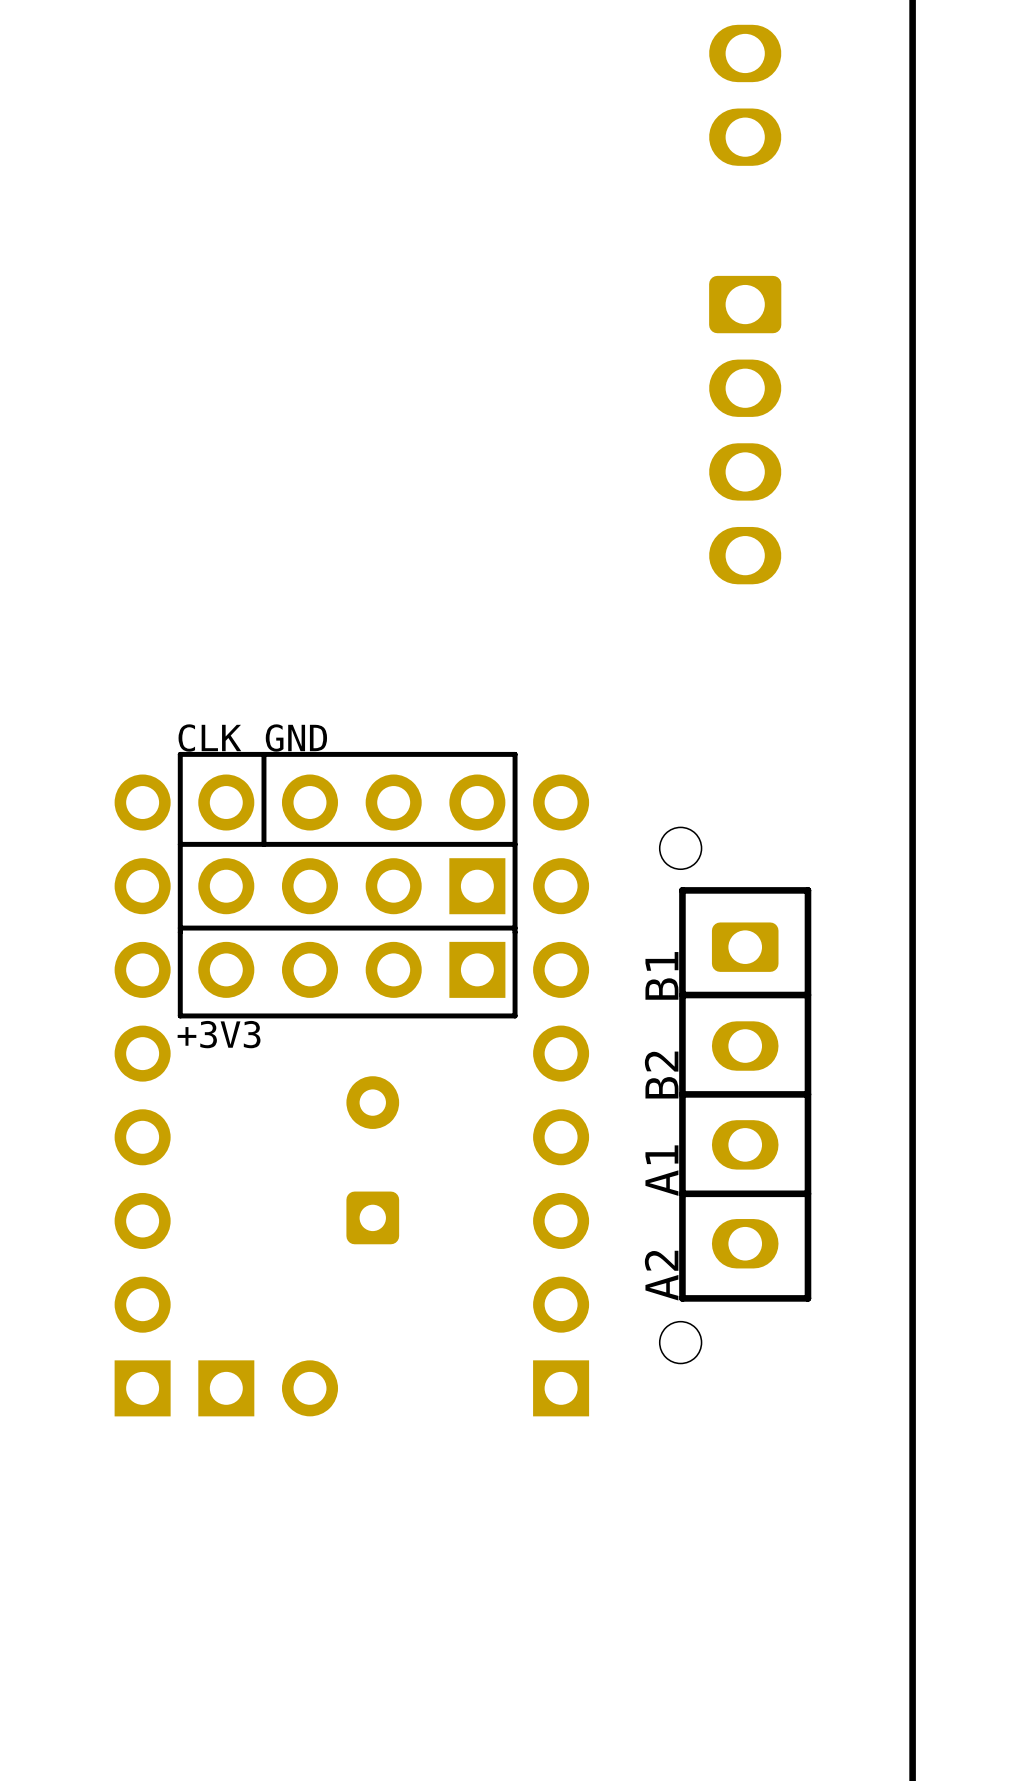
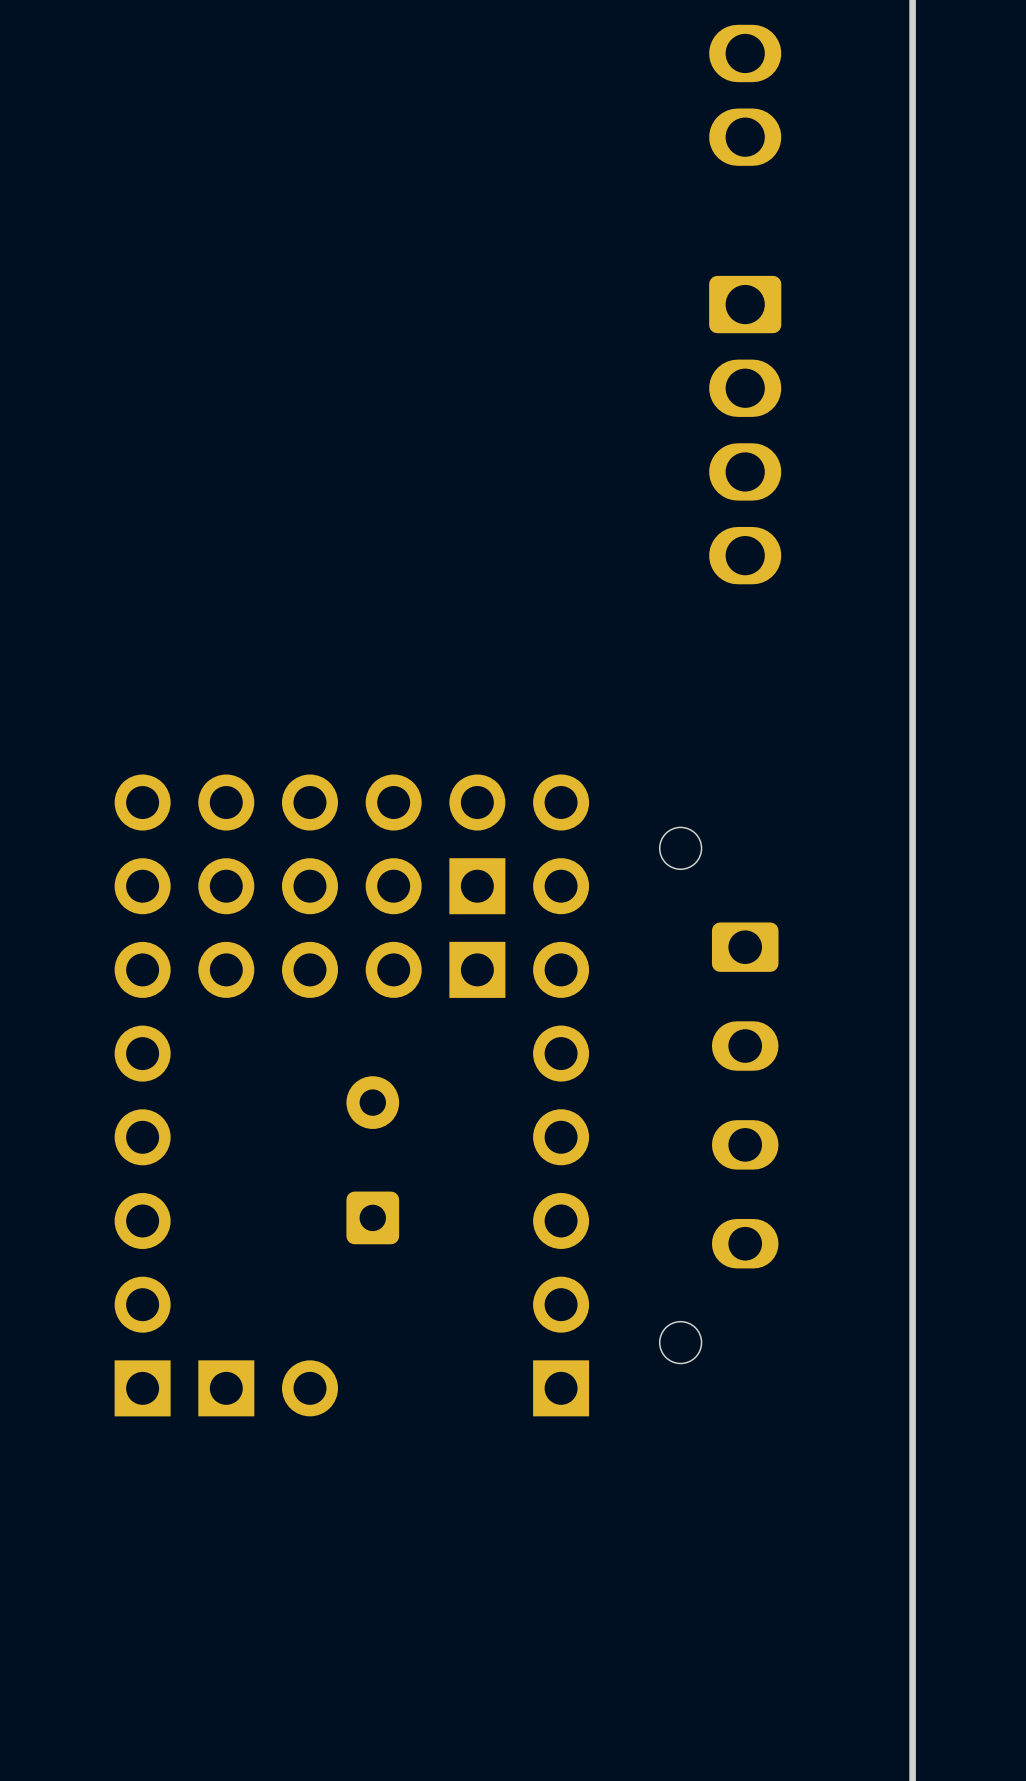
text: CLK (209, 738) -> none
text: GND (296, 738) -> none
line: (263, 754) (263, 844) -> none
line: (515, 754) (515, 1015) (180, 1015) (180, 754) (515, 754) -> none
line: (515, 844) (180, 844) -> none
line: (807, 890) (682, 890) (682, 1298) (807, 1298) (807, 890) -> none
line: (515, 928) (180, 928) -> none
text: B1 (661, 975) -> none
line: (807, 995) (682, 995) -> none
text: +3V3 (219, 1034) -> none
text: B2 (661, 1075) -> none
line: (807, 1094) (682, 1094) -> none
text: A1 (661, 1170) -> none
line: (807, 1193) (682, 1193) -> none
text: A2 (661, 1275) -> none

